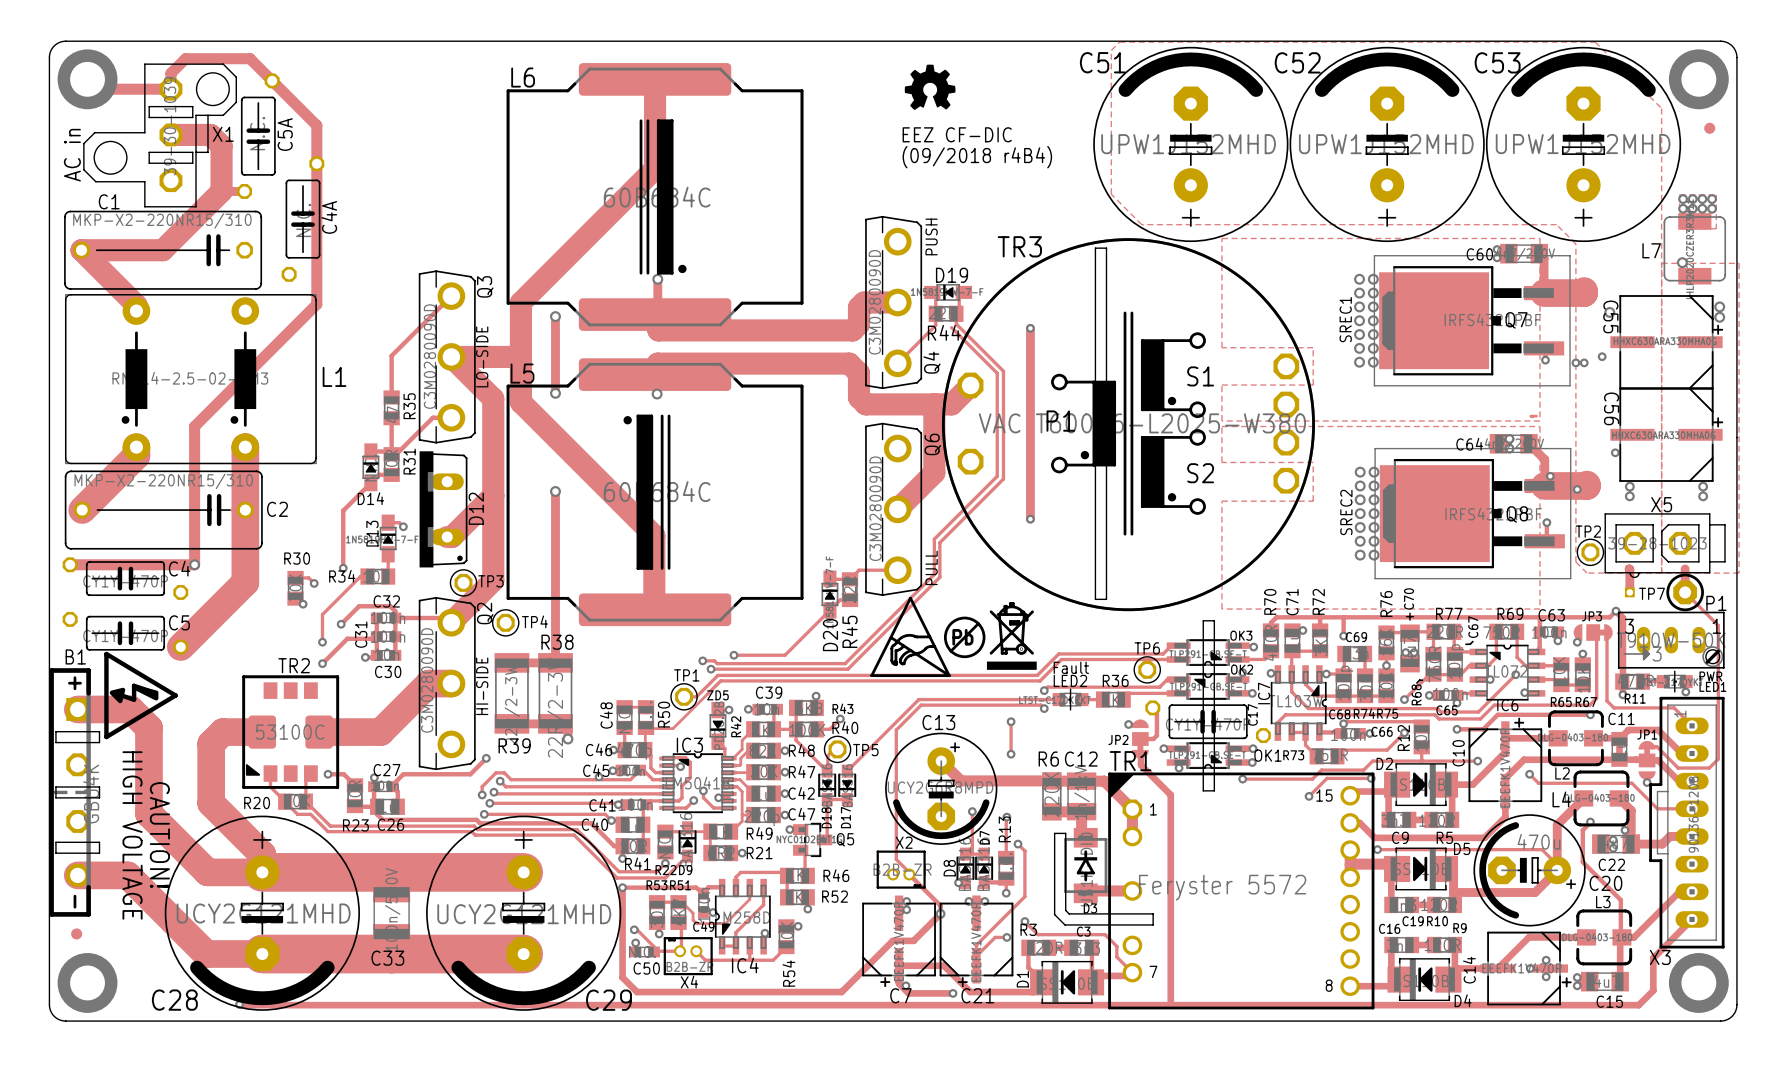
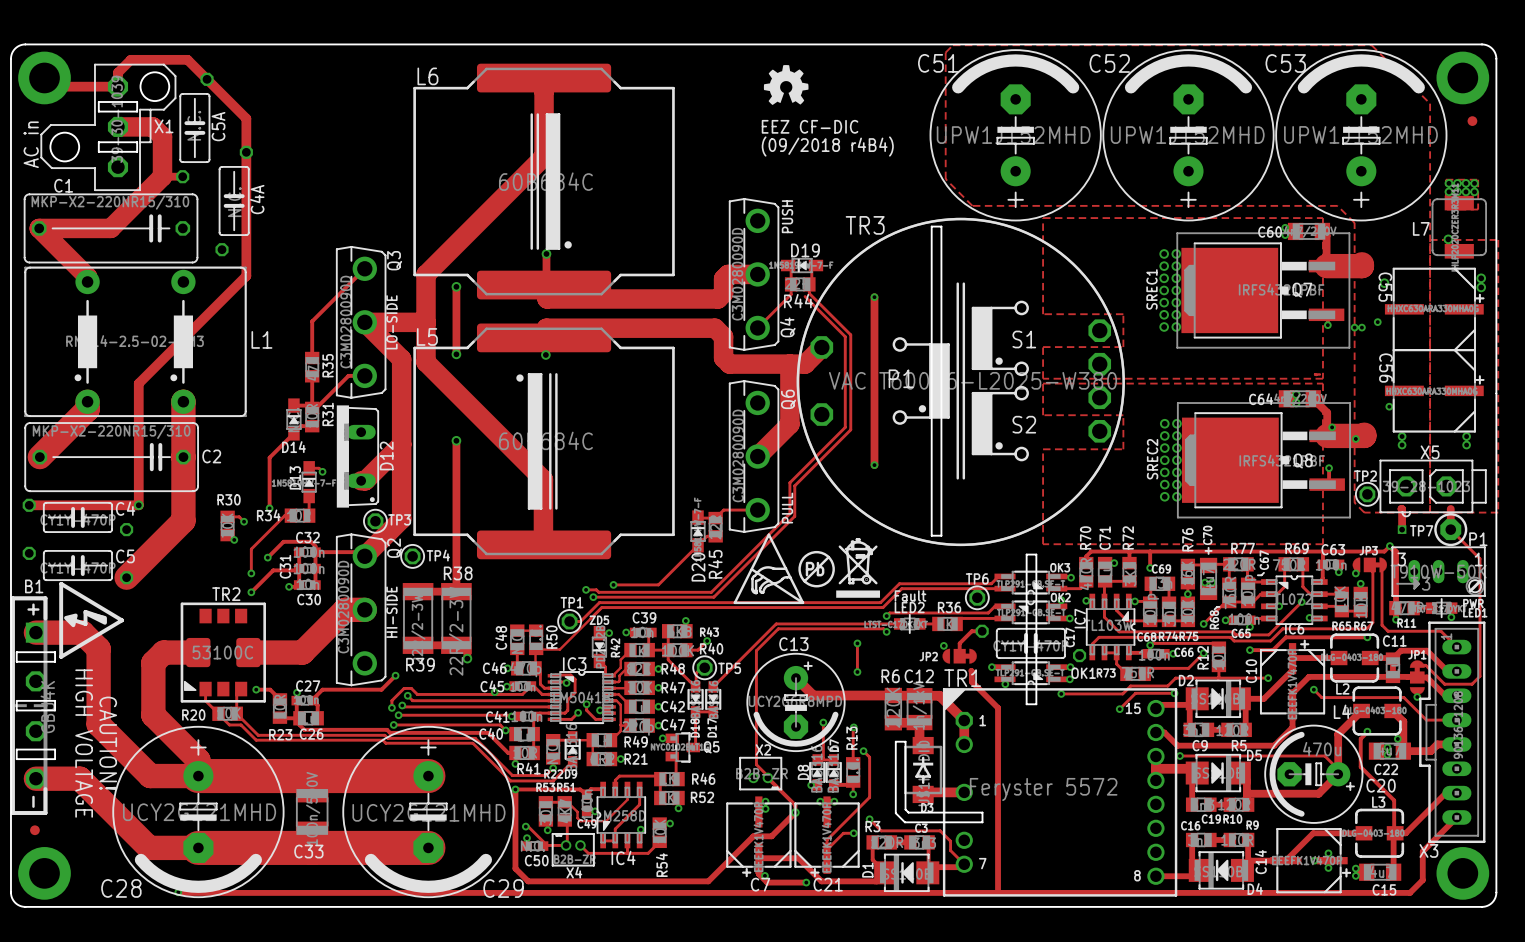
track: (1152, 707) (1156, 712) (1156, 735) (1153, 739) (1140, 739) -> (982, 631) (971, 631) (959, 643) (959, 656)
via position: (1128, 724) -> (943, 645)
JP2 rotation: 0° (1140, 739) -> 90° counterclockwise (959, 656)

